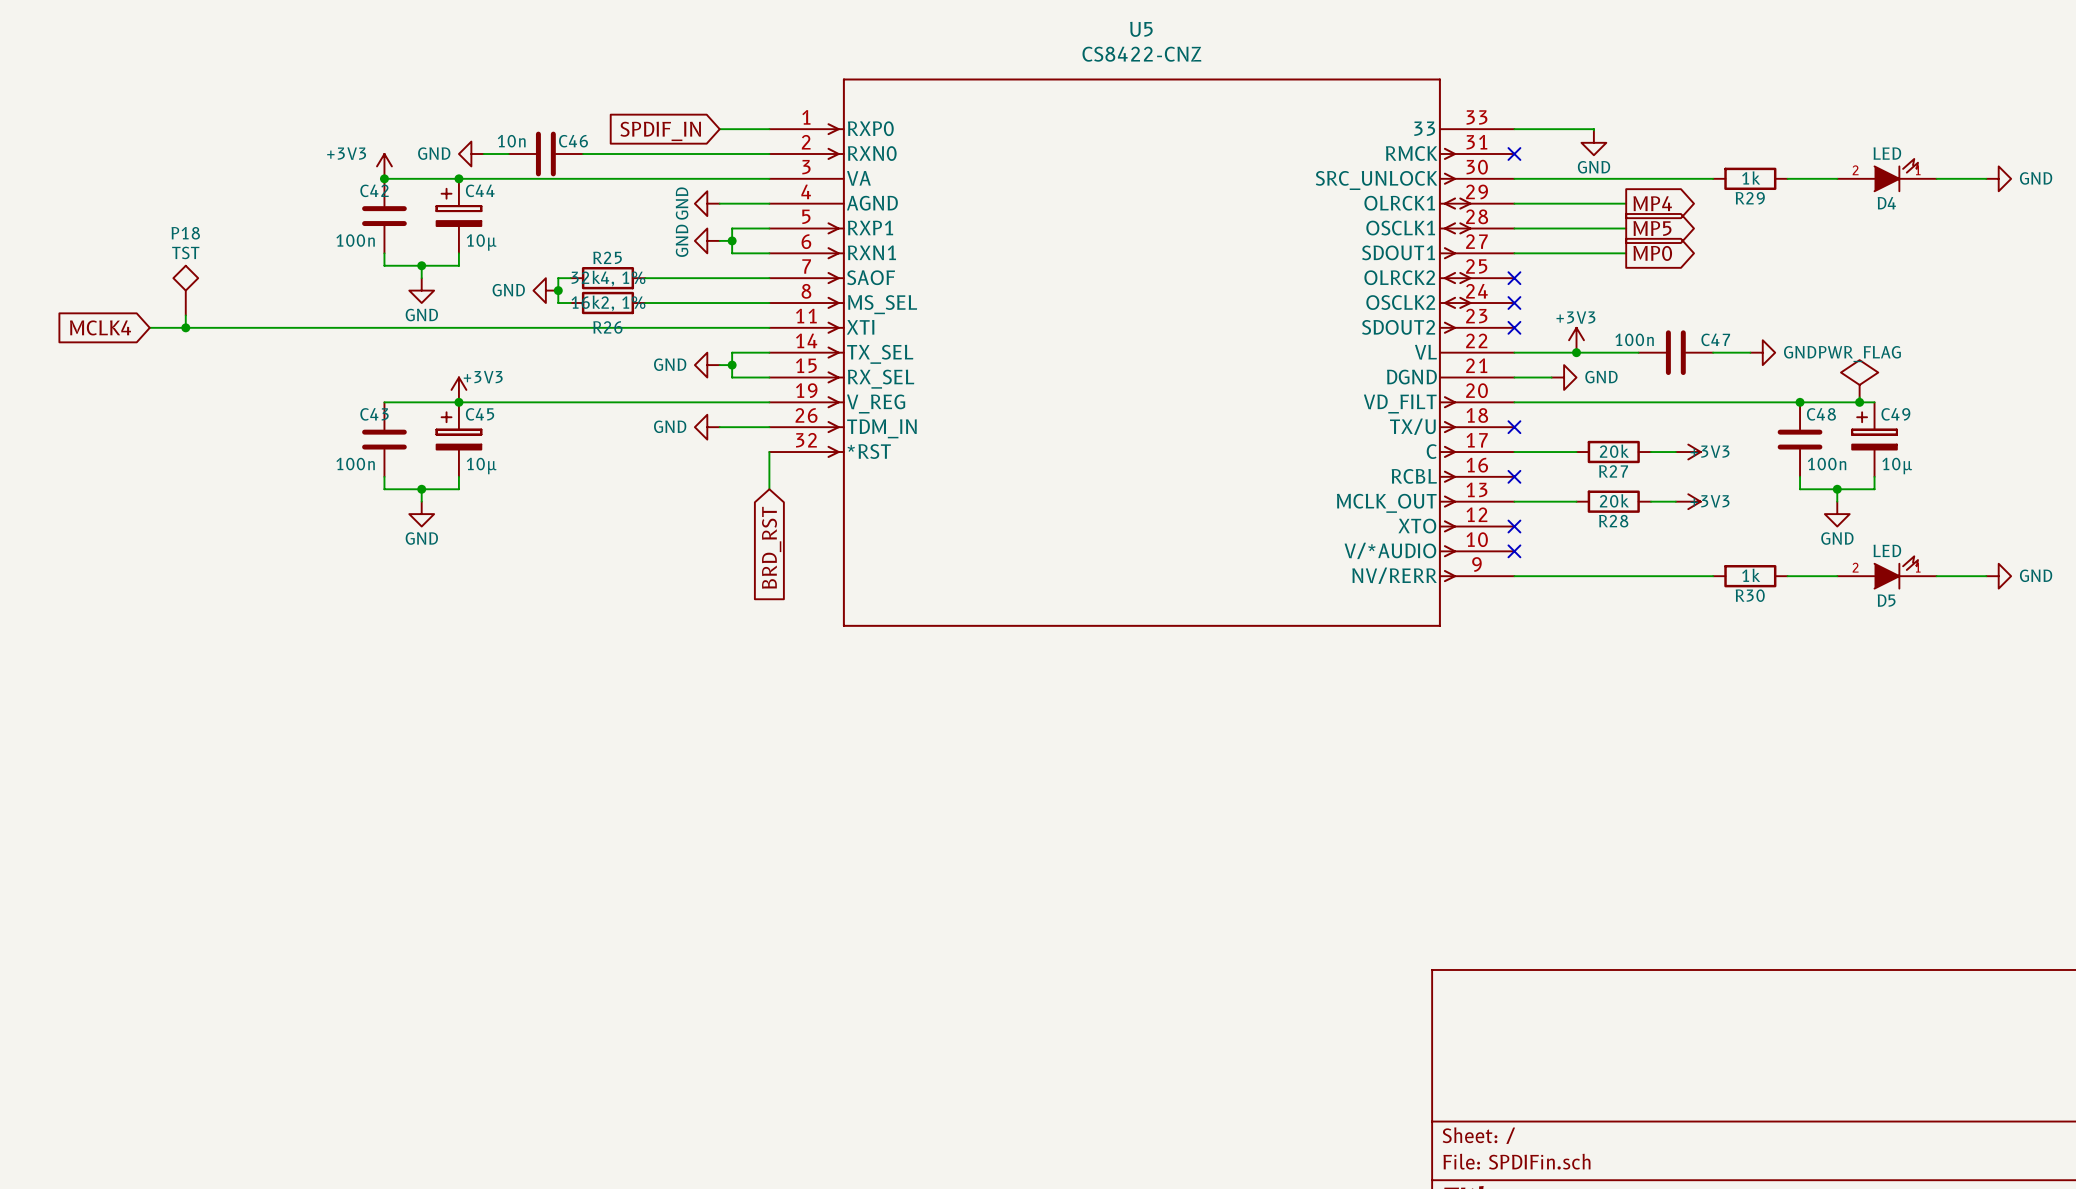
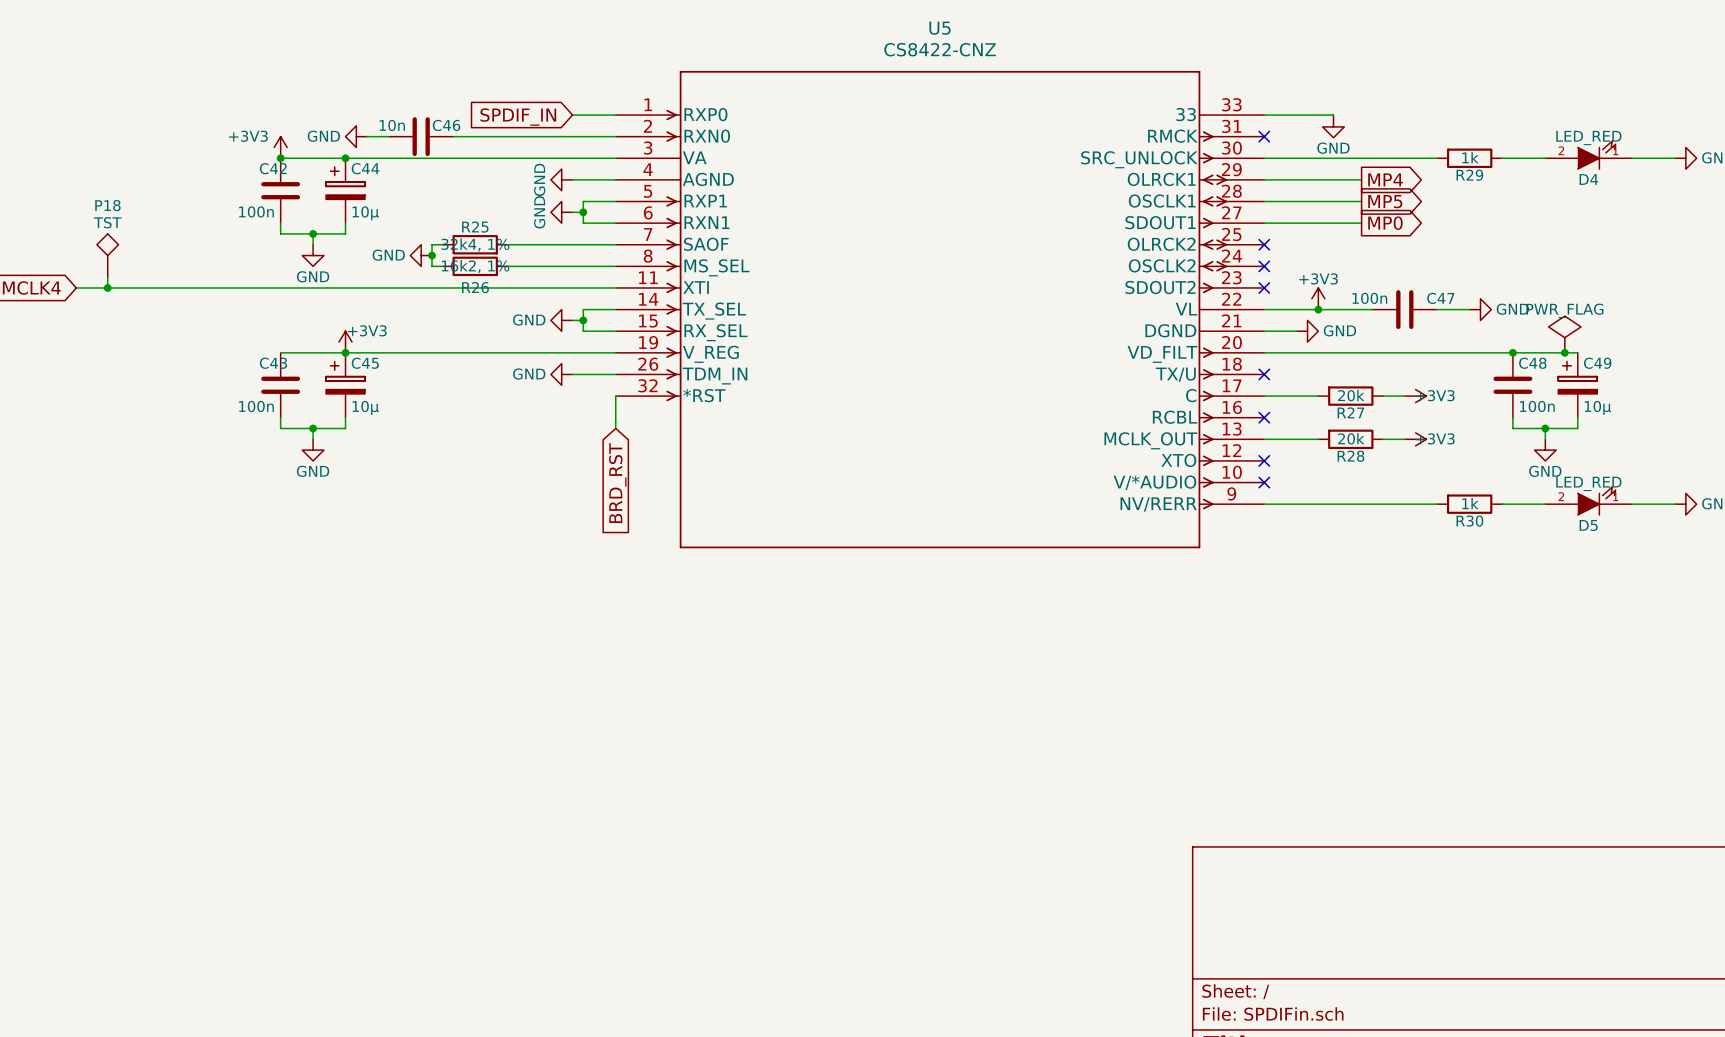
D4 value: LED (1887, 153) -> LED_RED (1588, 138)
D5 value: LED (1887, 550) -> LED_RED (1588, 483)

